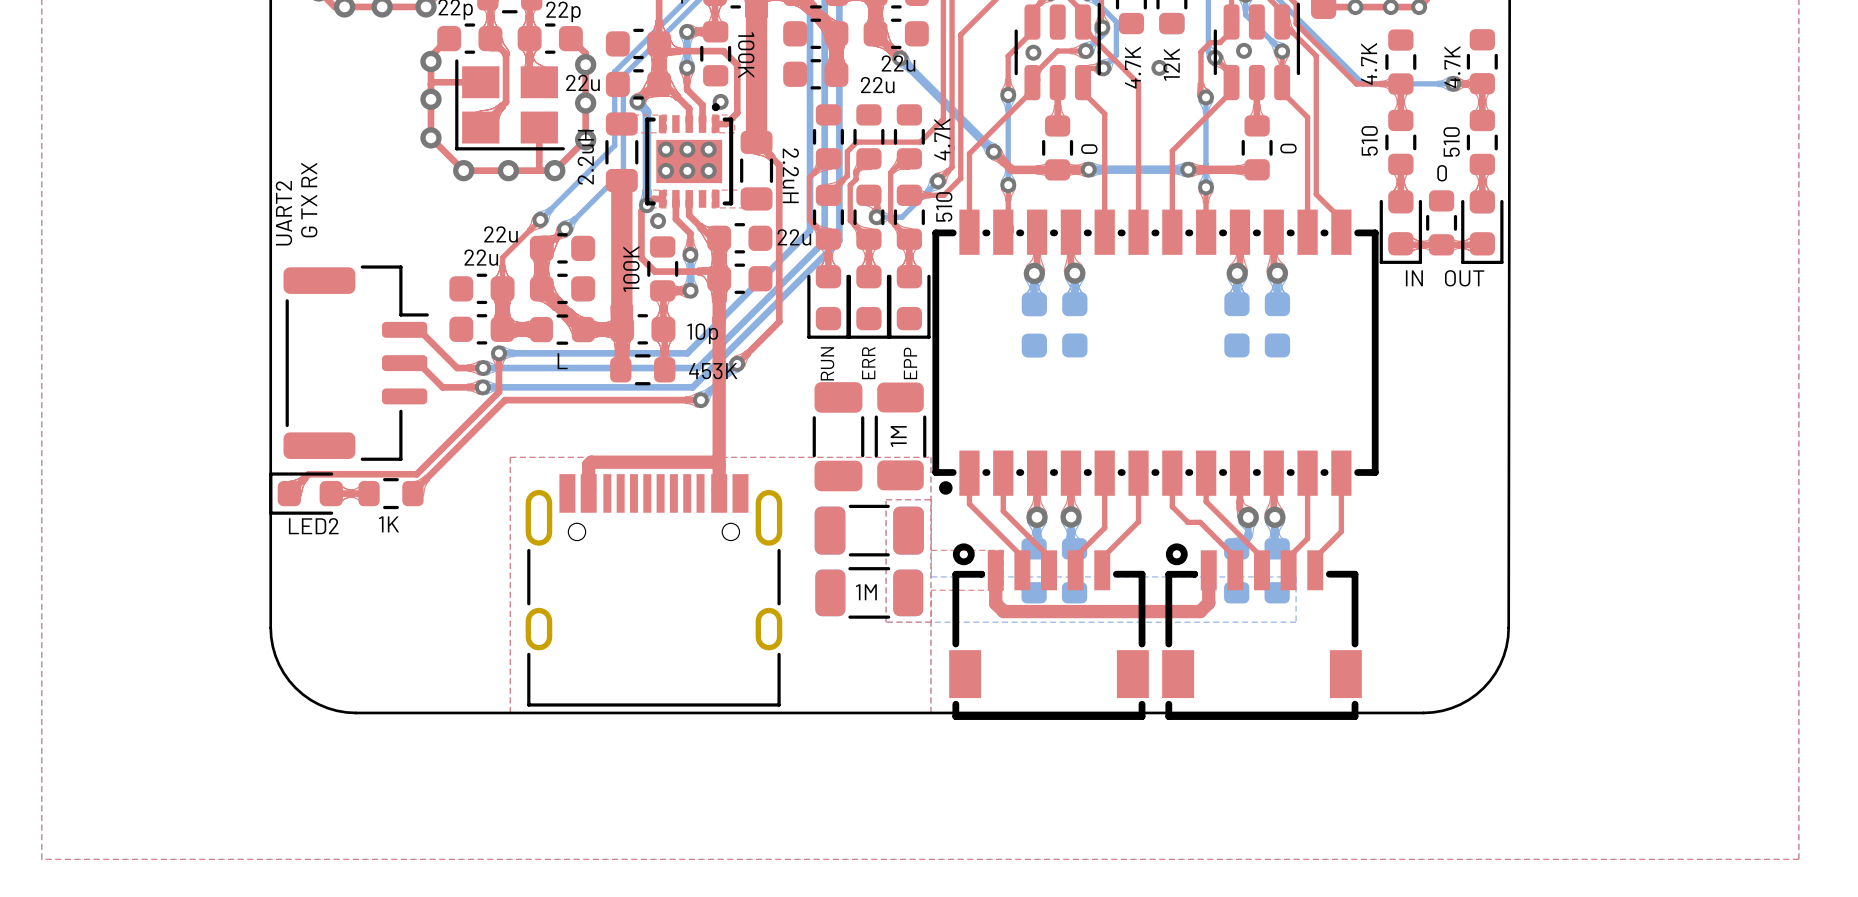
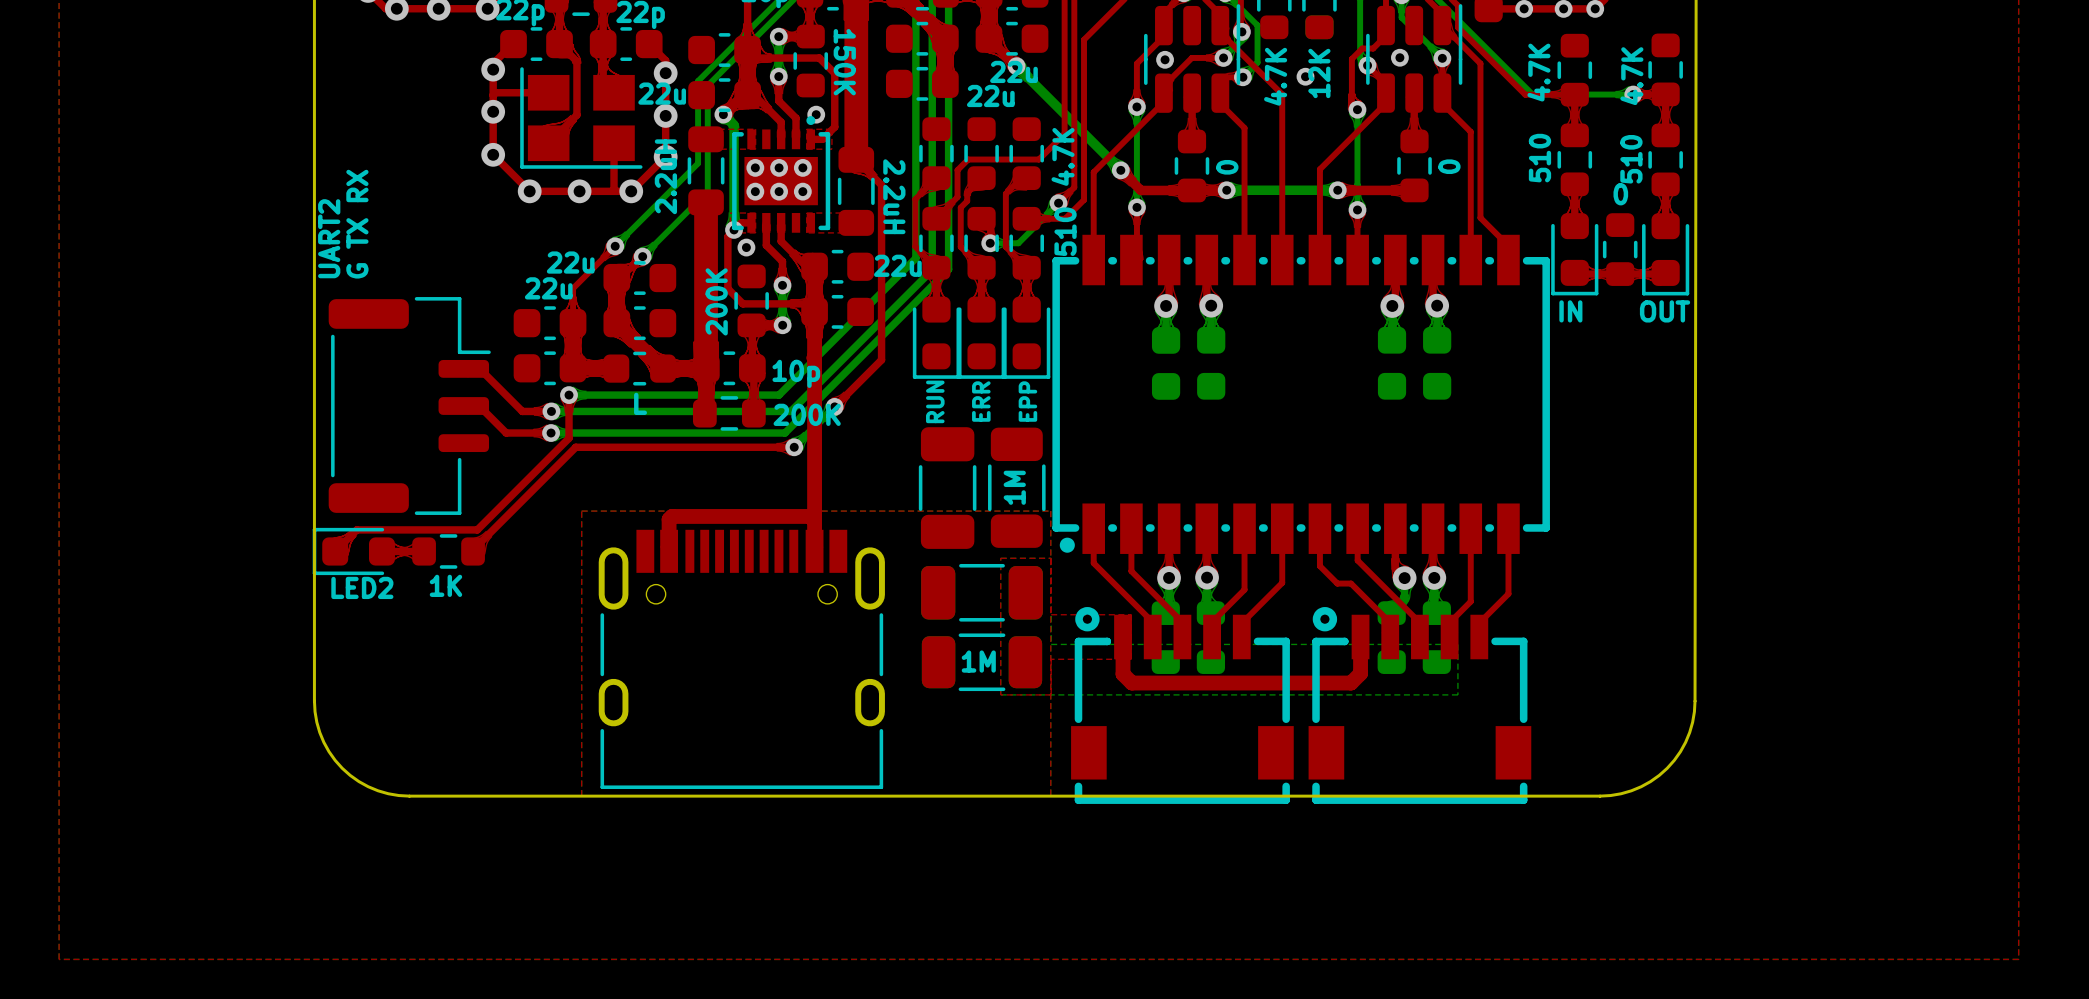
text: 100K (746, 55) -> 150K (844, 62)
text: 100K (631, 269) -> 200K (716, 301)
text: 453K (713, 371) -> 200K (807, 414)

